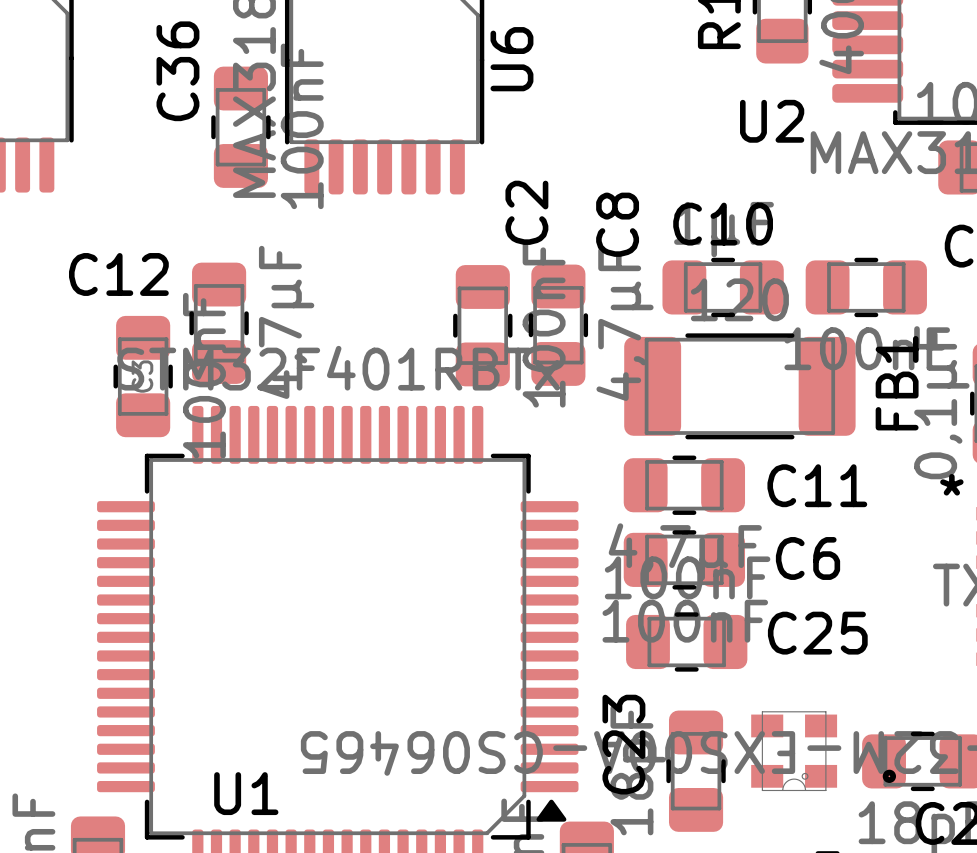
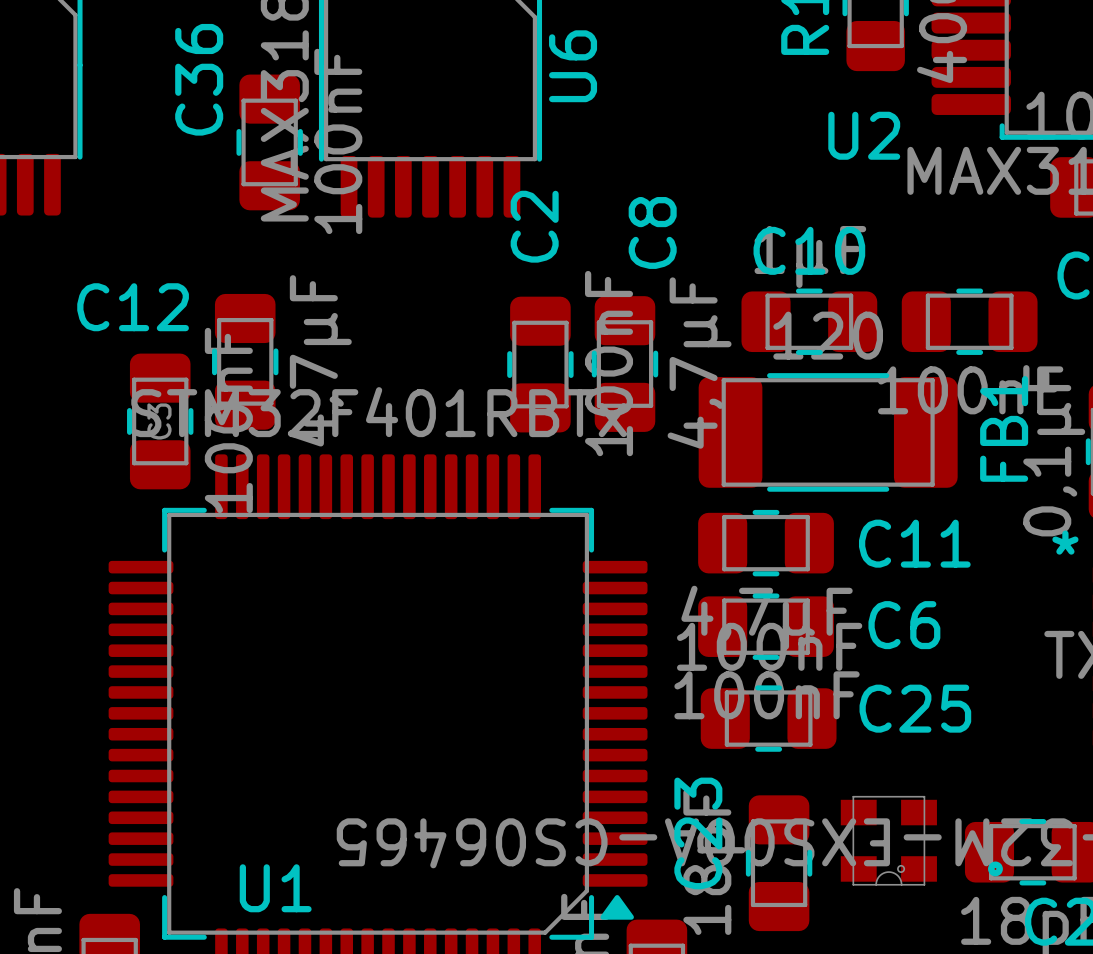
C2 name position: C2 (526, 212) -> C2 (534, 226)
C8 name position: C8 (617, 224) -> C8 (652, 232)

